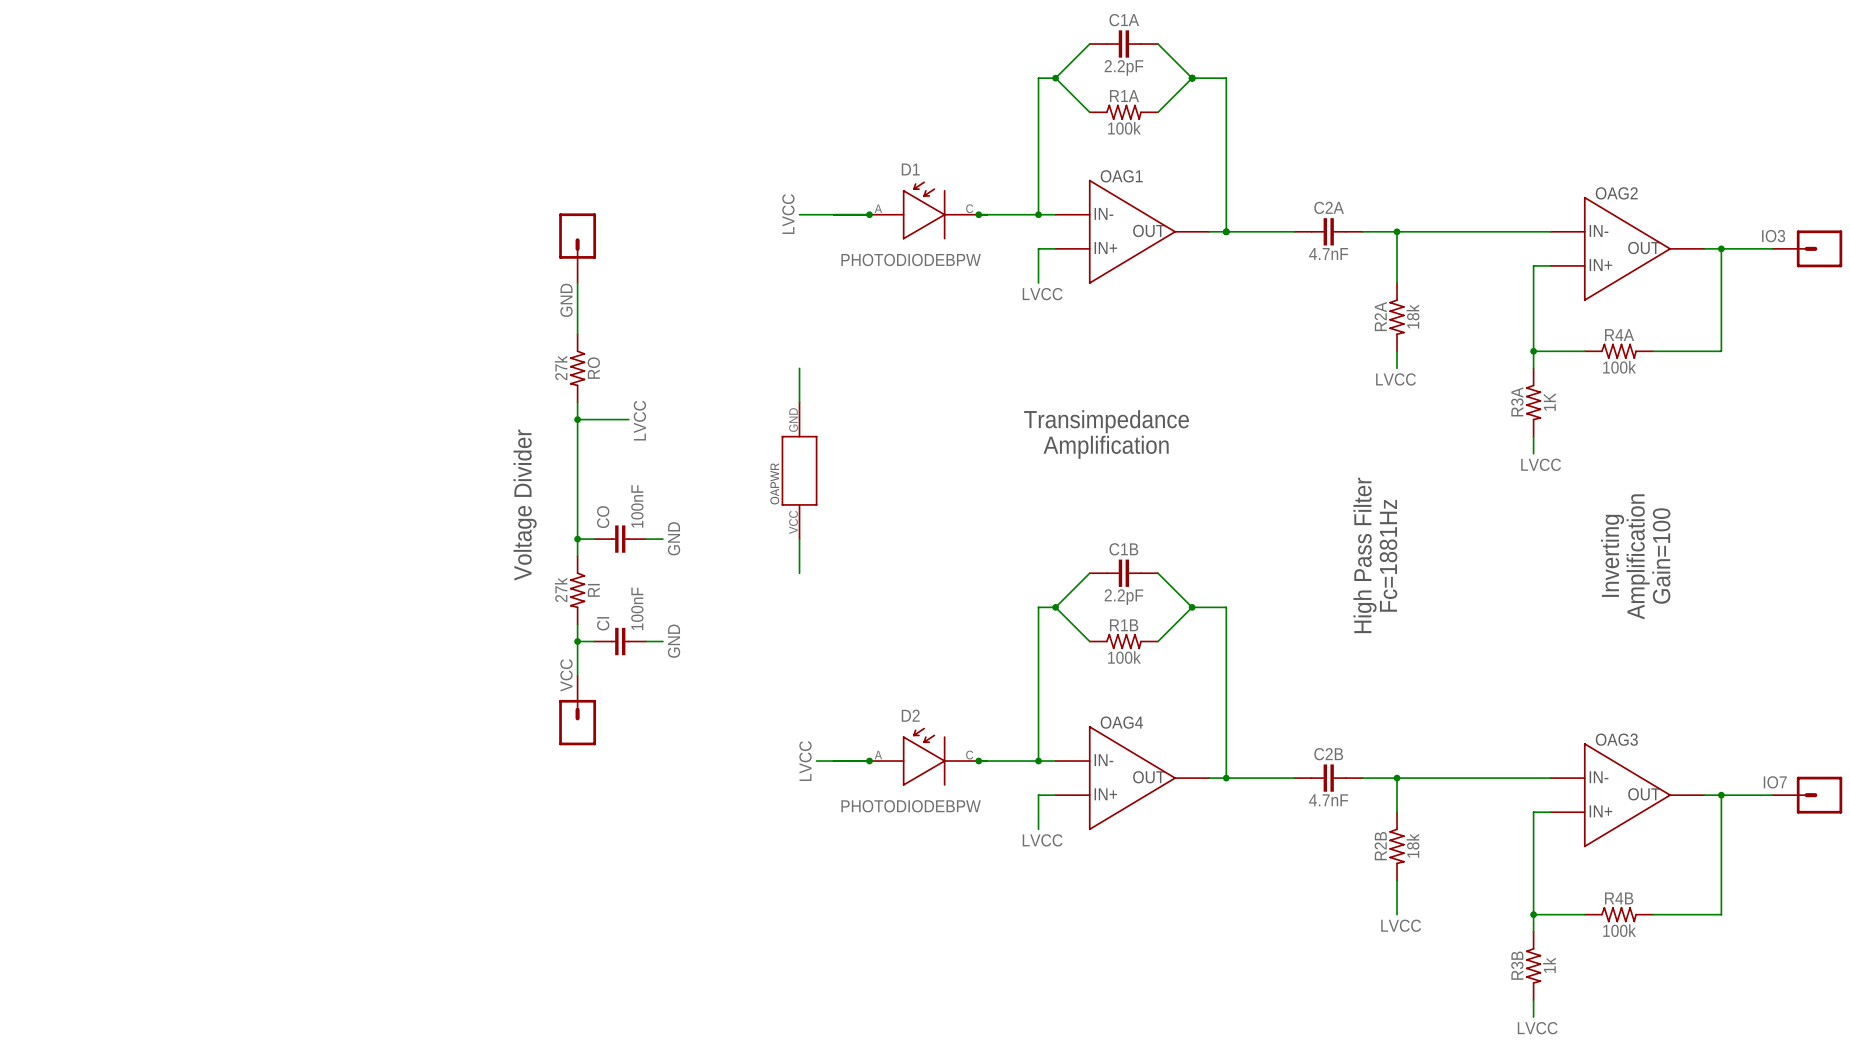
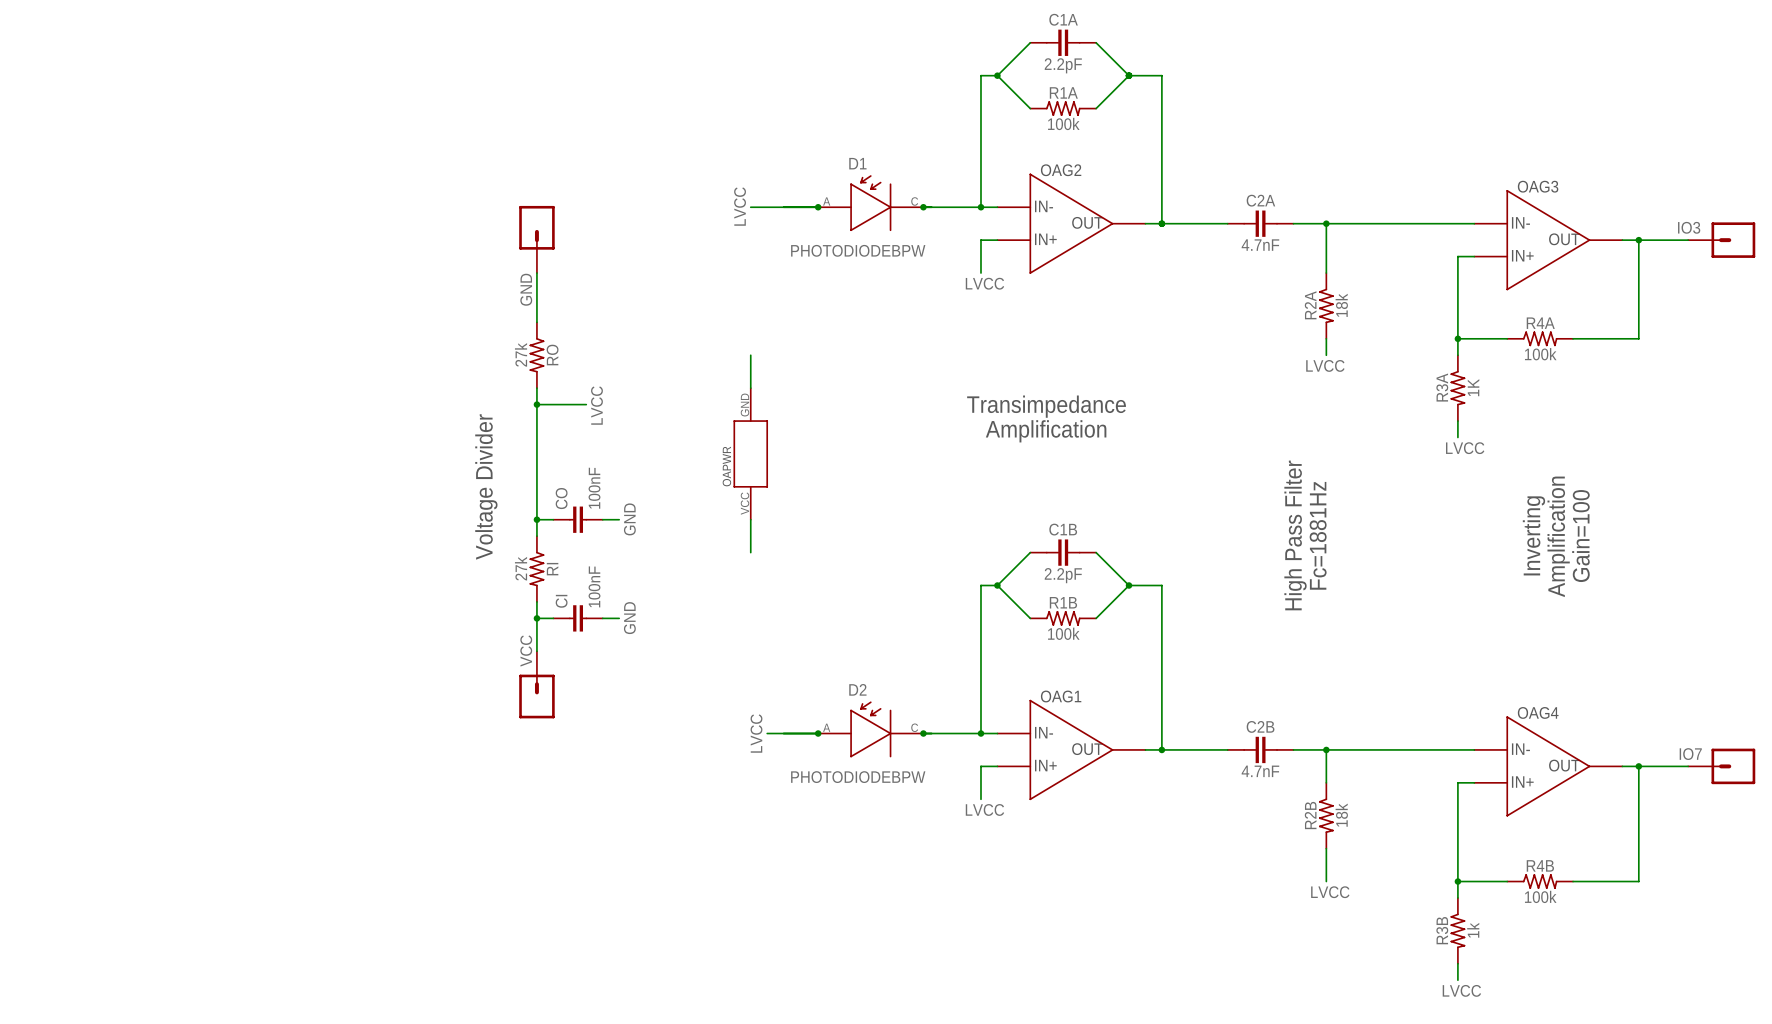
OAG1 name: OAG1 (1121, 176) -> OAG2 (1061, 170)
OAG2 name: OAG2 (1616, 193) -> OAG3 (1538, 186)
OAG4 name: OAG4 (1121, 722) -> OAG1 (1061, 696)
OAG3 name: OAG3 (1616, 739) -> OAG4 (1538, 712)

